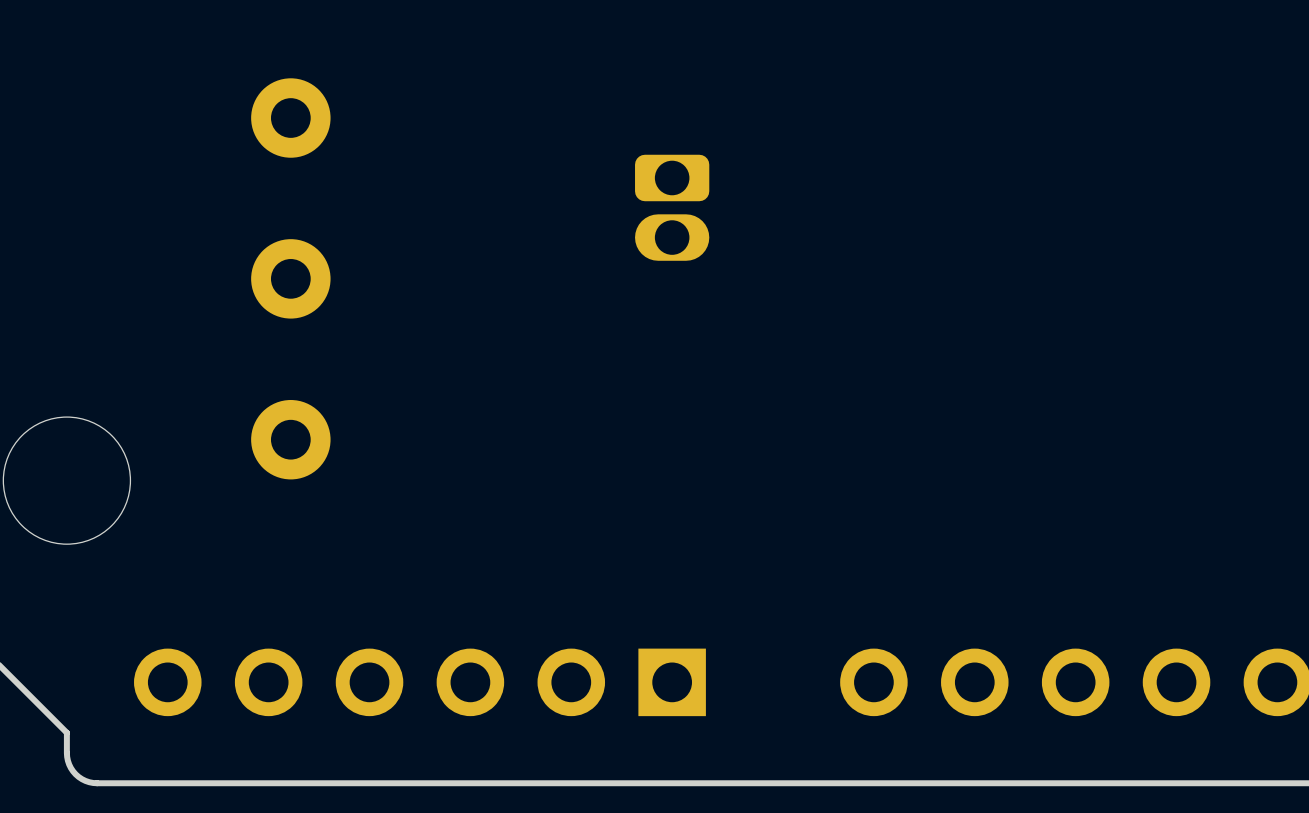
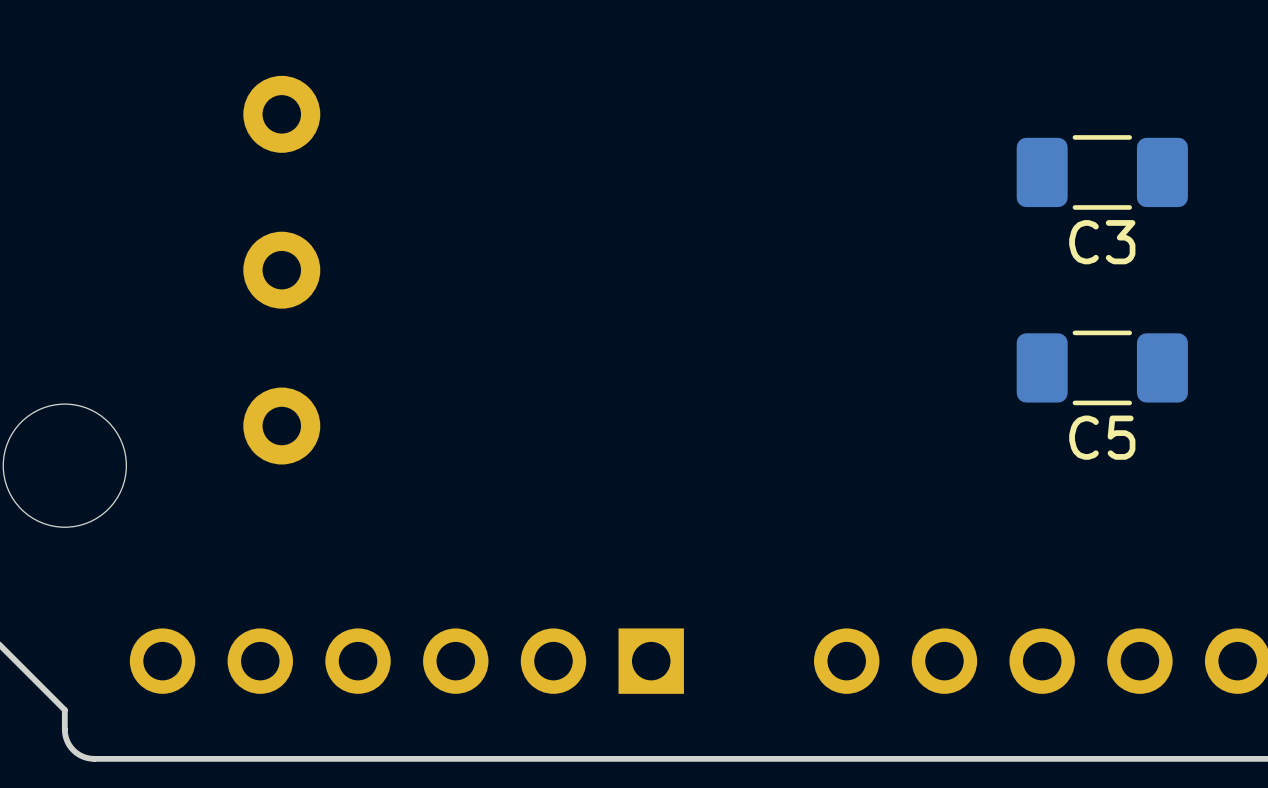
C3: none -> (1102, 172)
part: (672, 207) -> none
C5: none -> (1102, 367)

